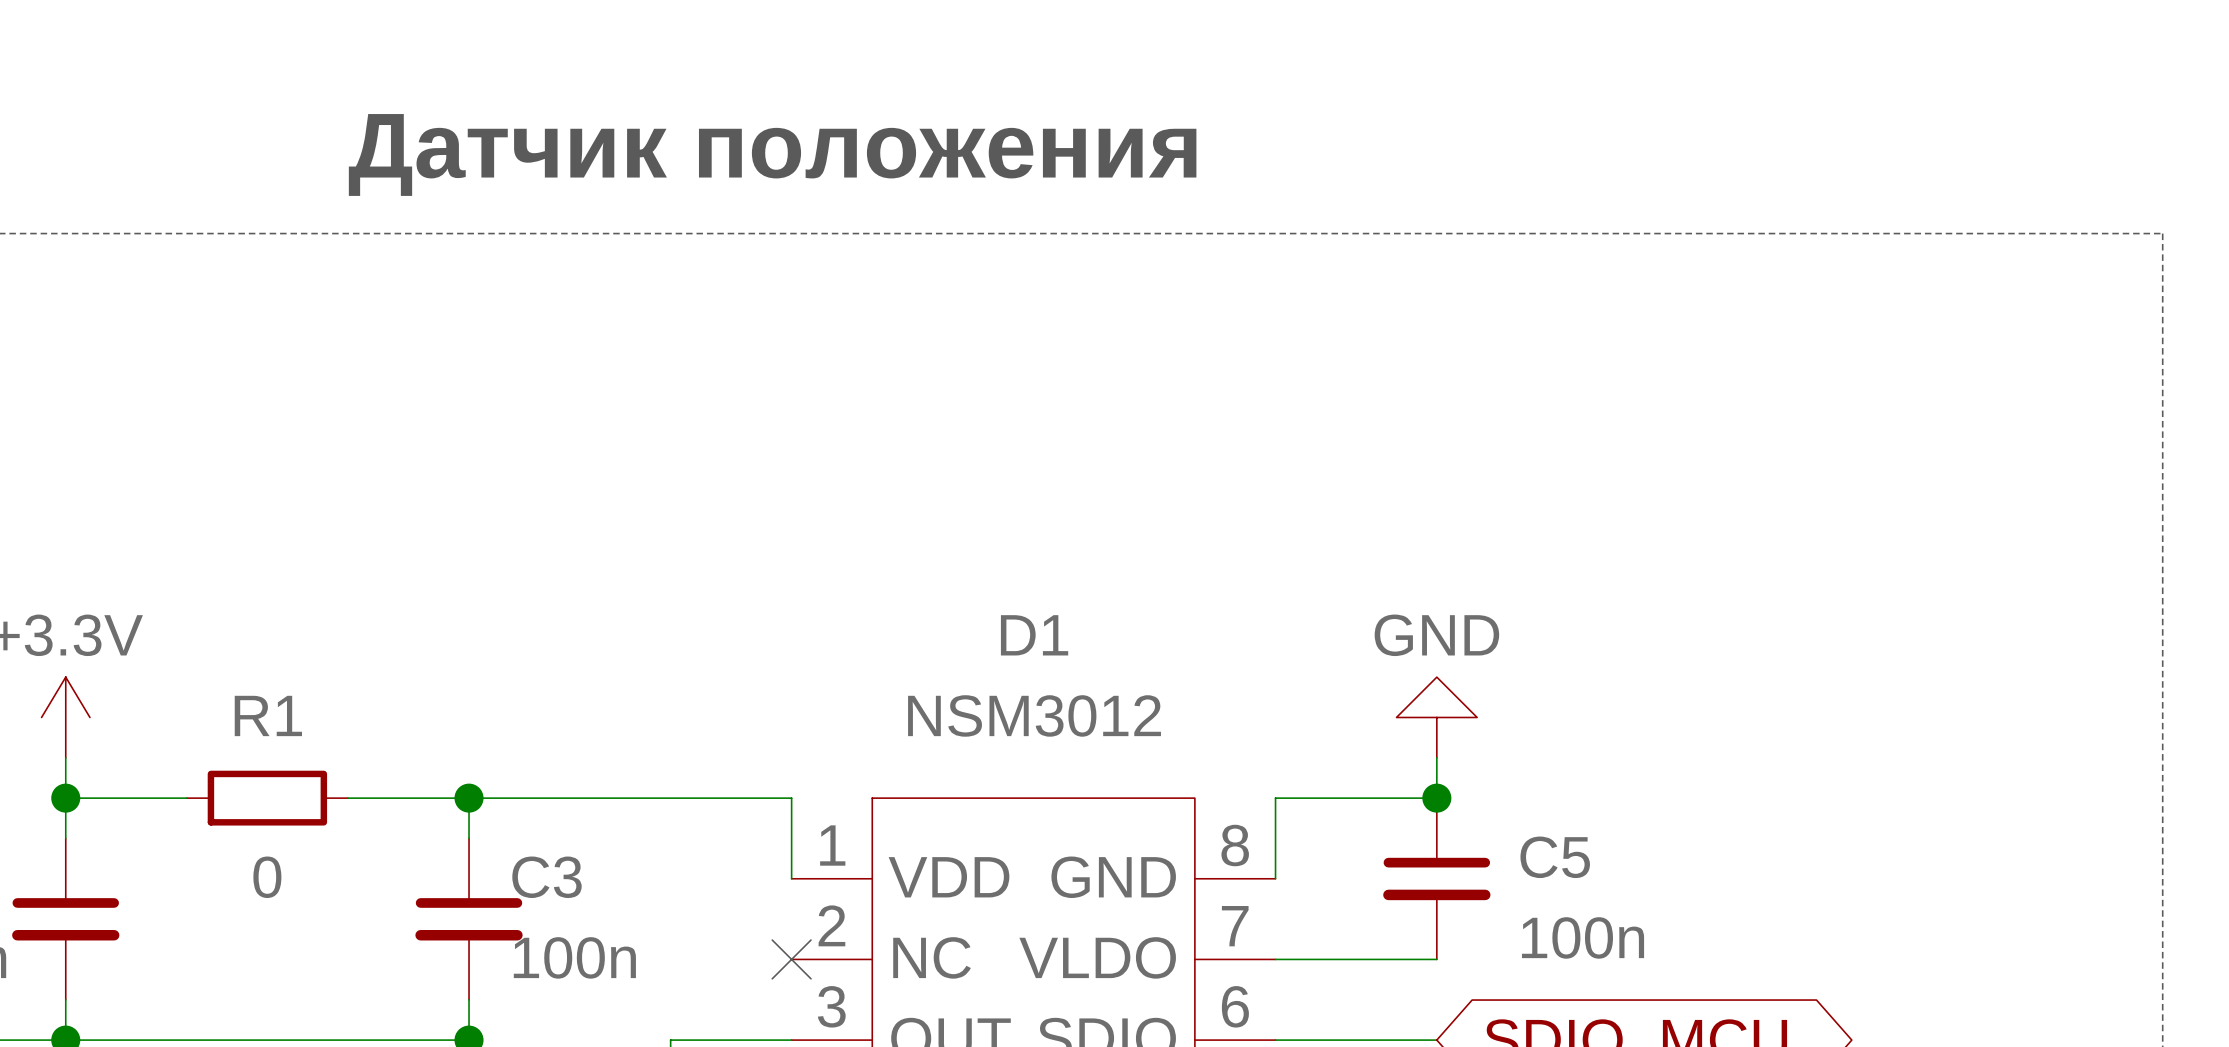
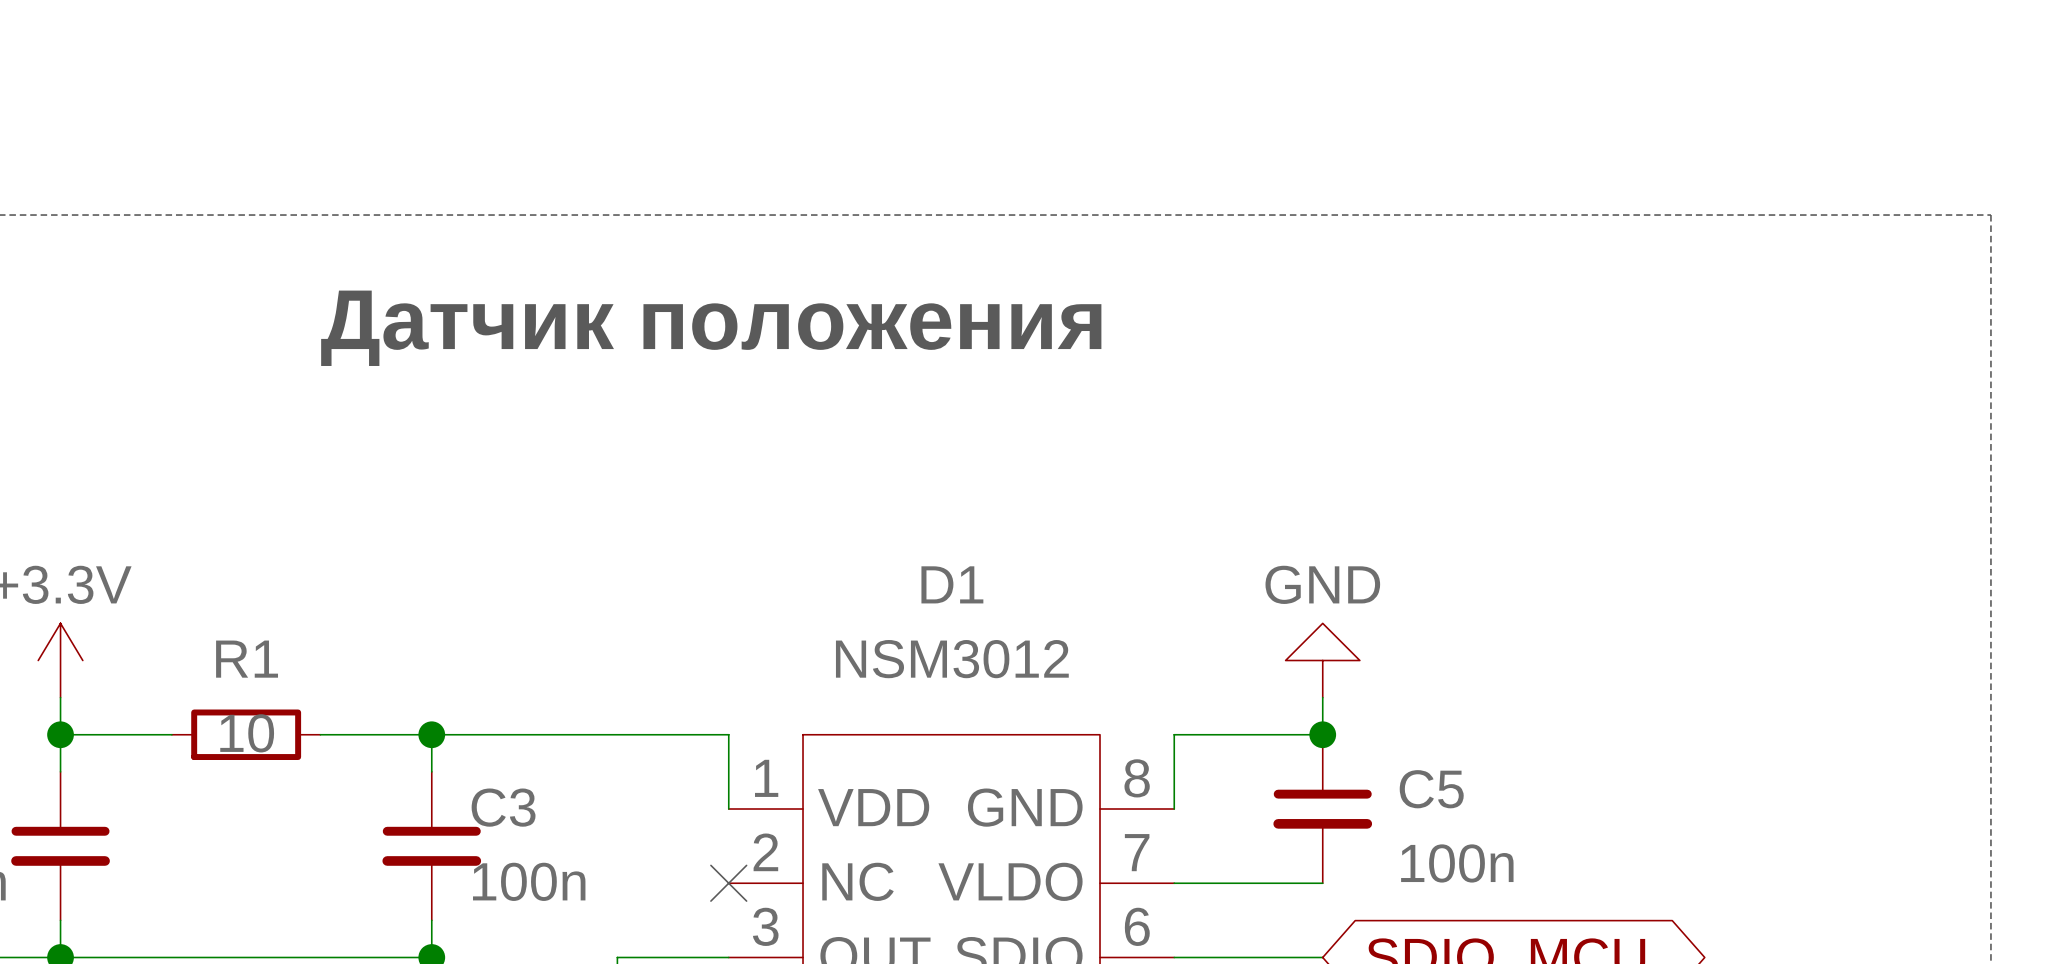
text position: Датчик положения (772, 154) -> Датчик положения (711, 328)
R1 value: 0 (267, 877) -> 10 (247, 733)

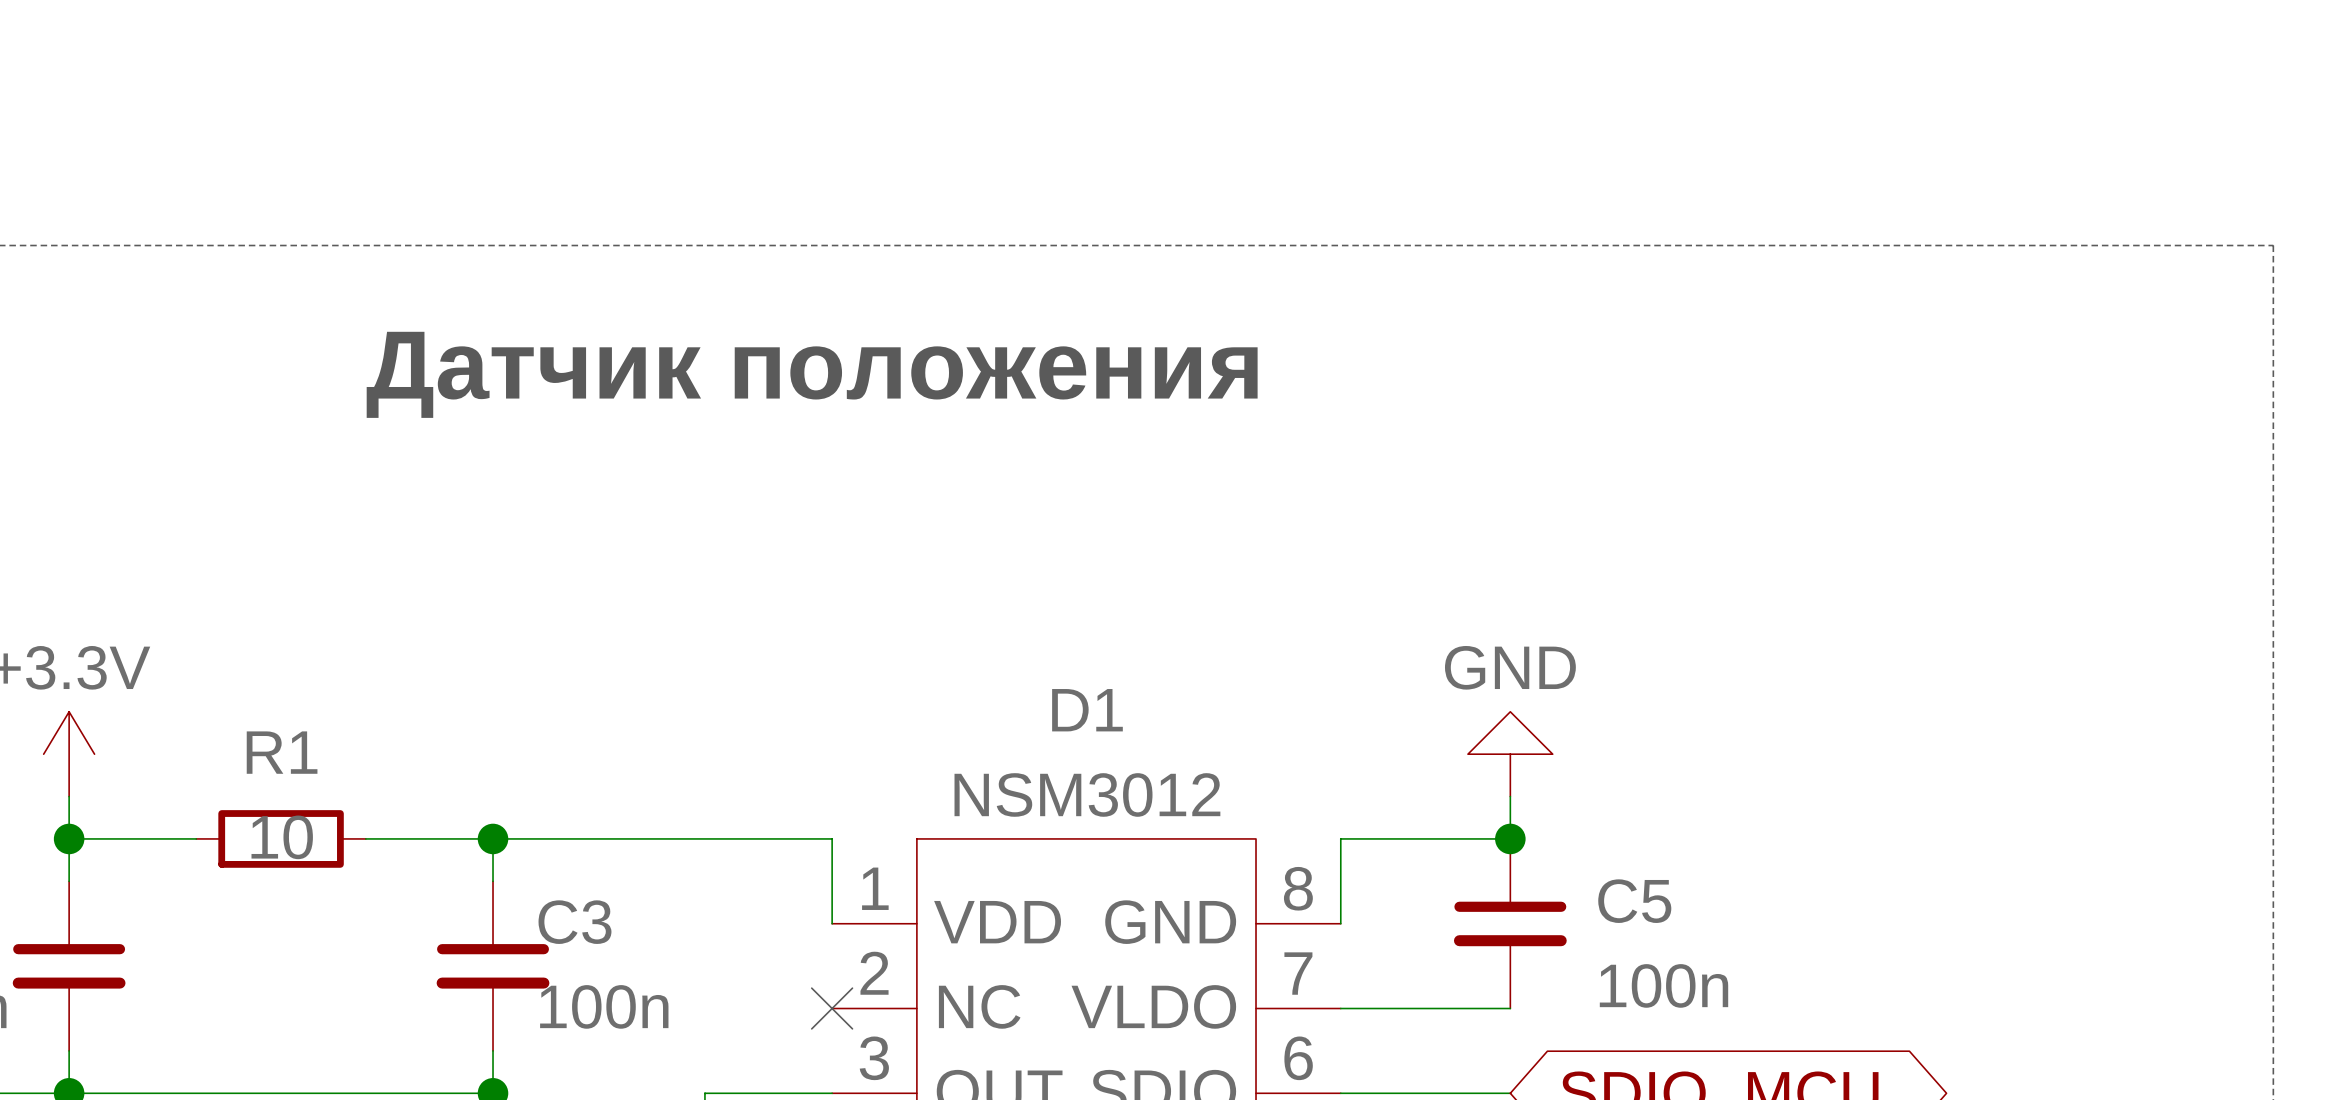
D1 name position: D1 (952, 584) -> D1 (1087, 710)
D1 value position: NSM3012 (952, 659) -> NSM3012 (1087, 794)

